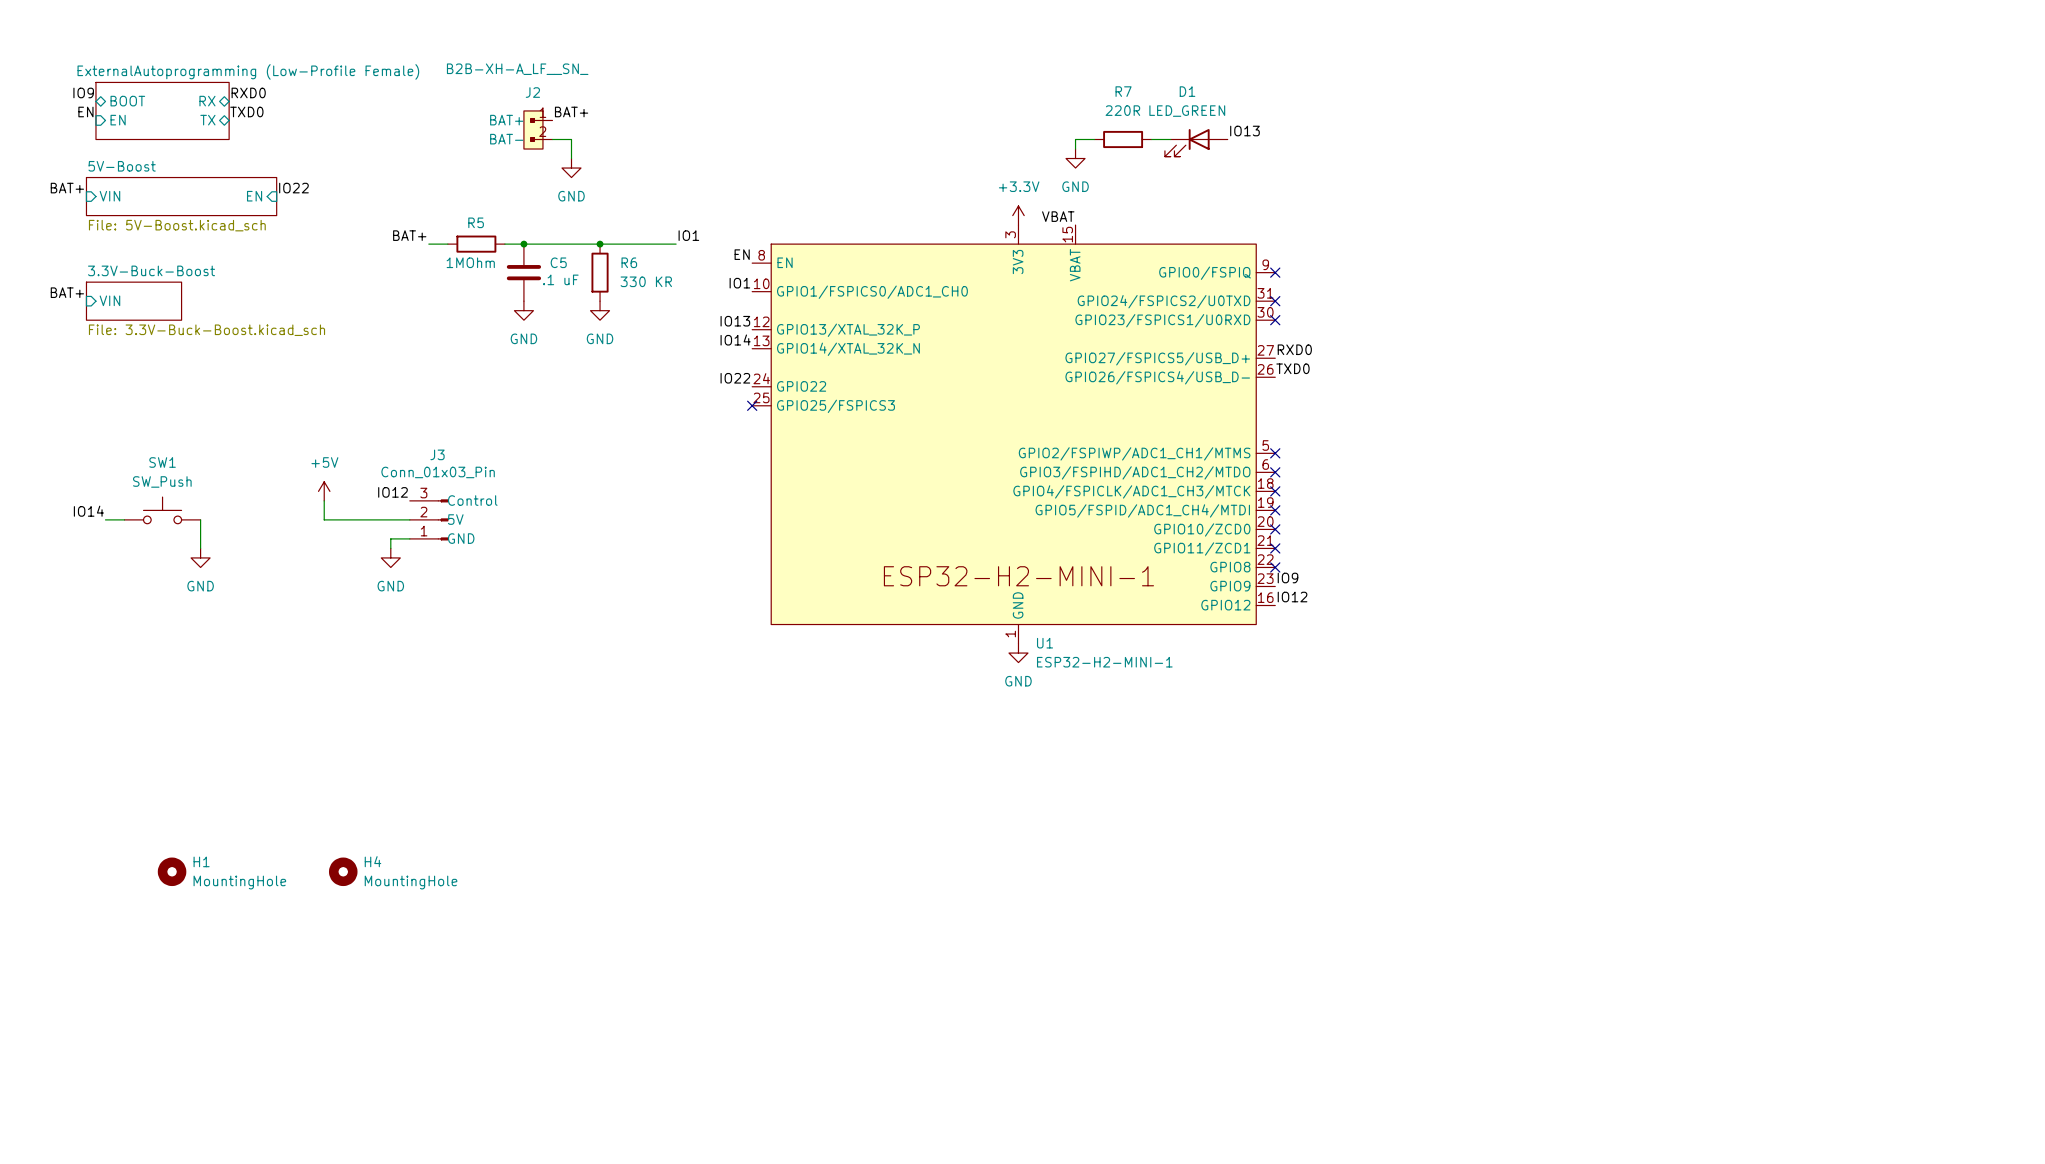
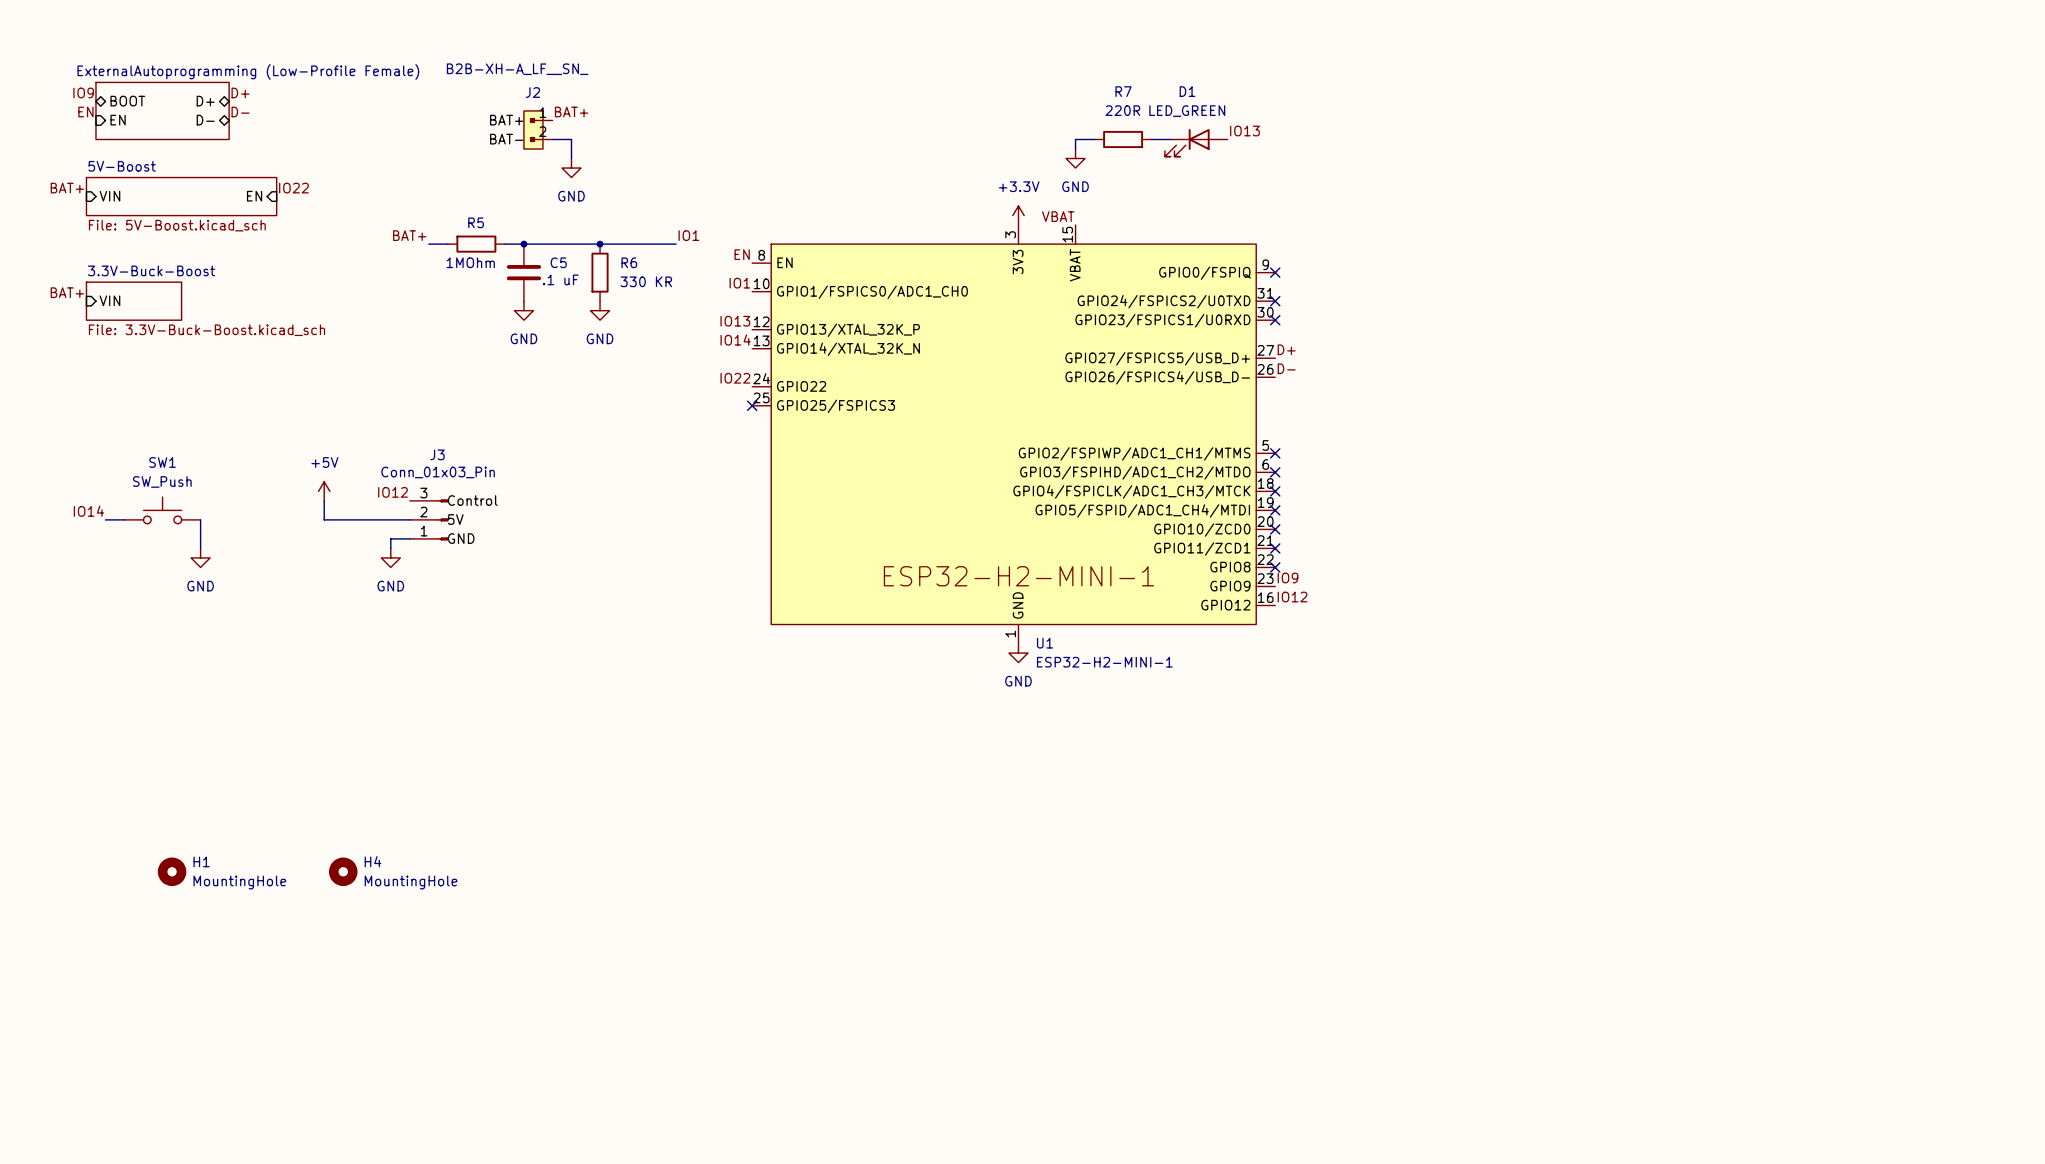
label: RXD0 (248, 92) -> D+ (240, 92)
sheet pin: RX (207, 101) -> D+ (205, 101)
label: TXD0 (246, 111) -> D- (240, 111)
sheet pin: TX (207, 120) -> D- (205, 120)
label: RXD0 (1294, 349) -> D+ (1286, 349)
label: TXD0 (1292, 368) -> D- (1286, 368)

